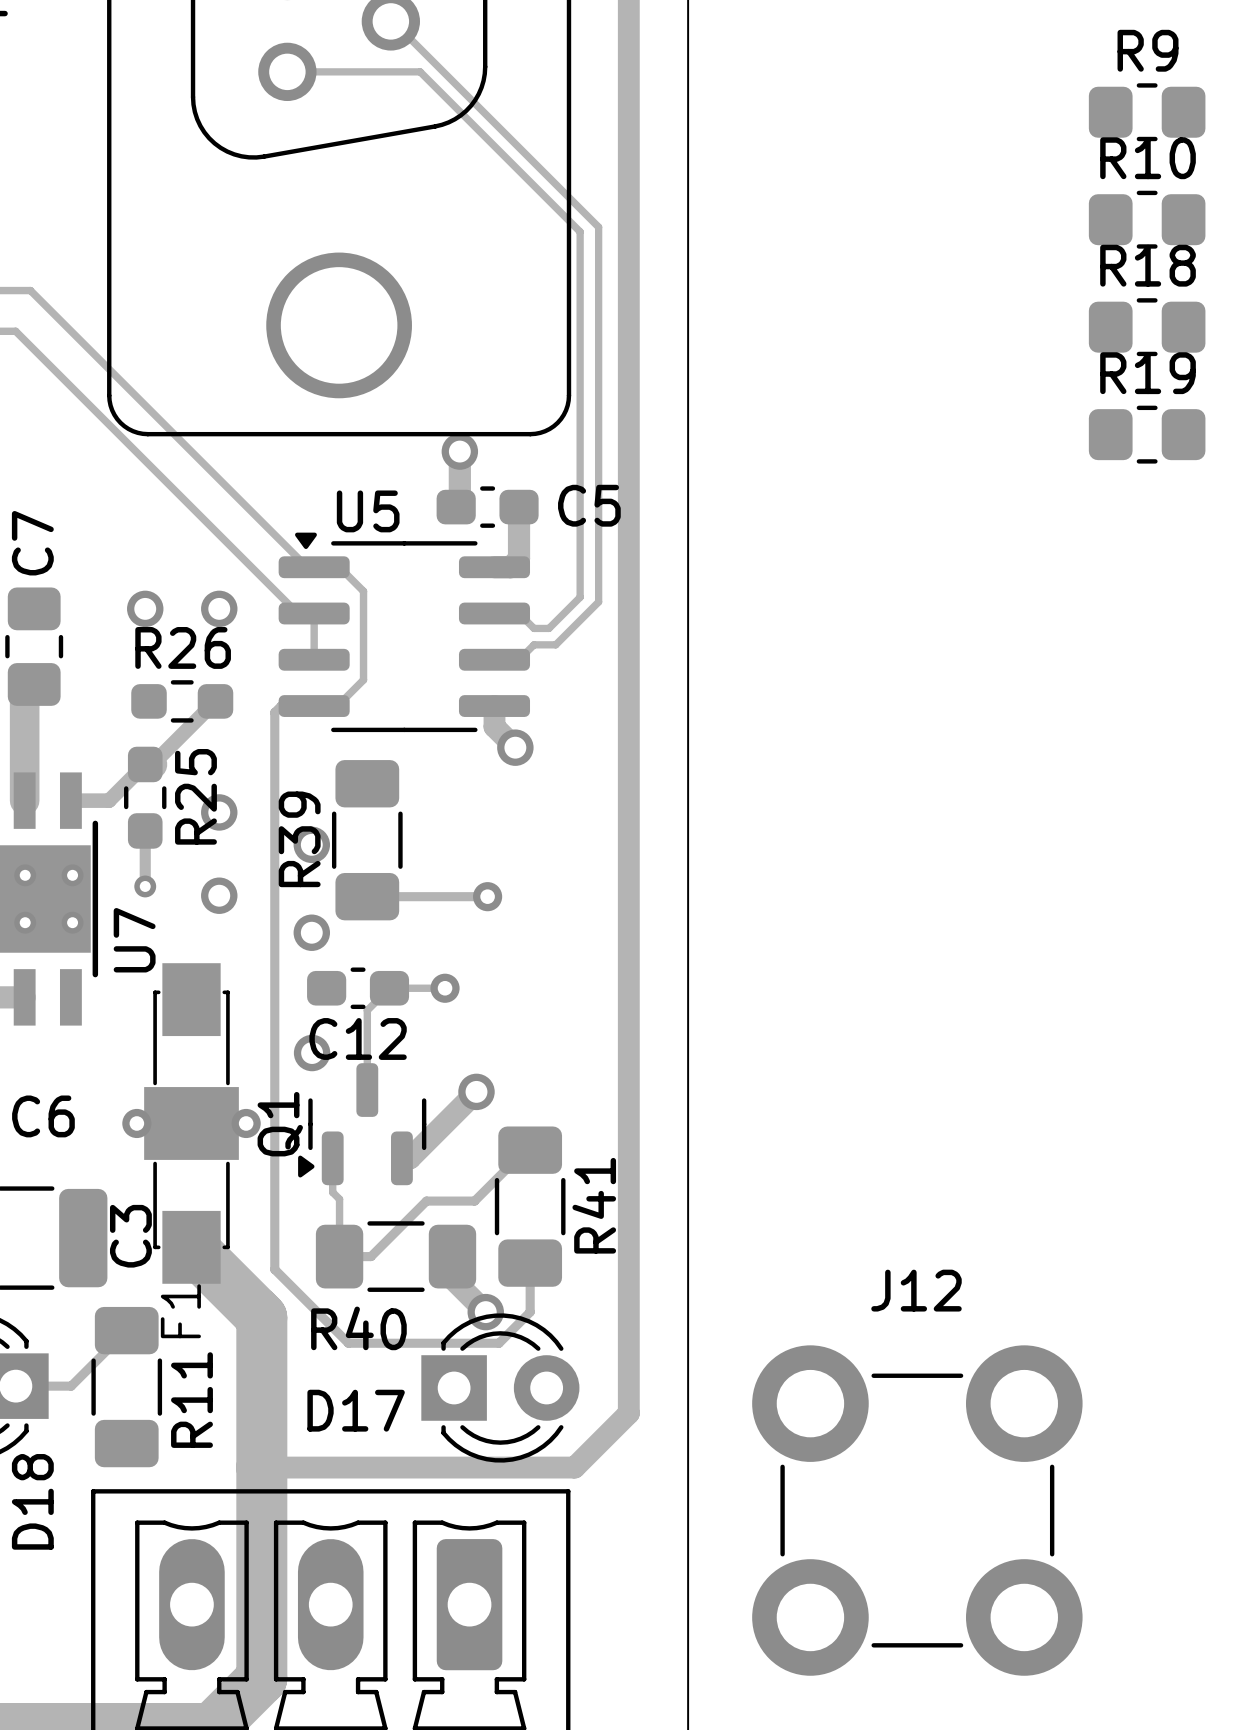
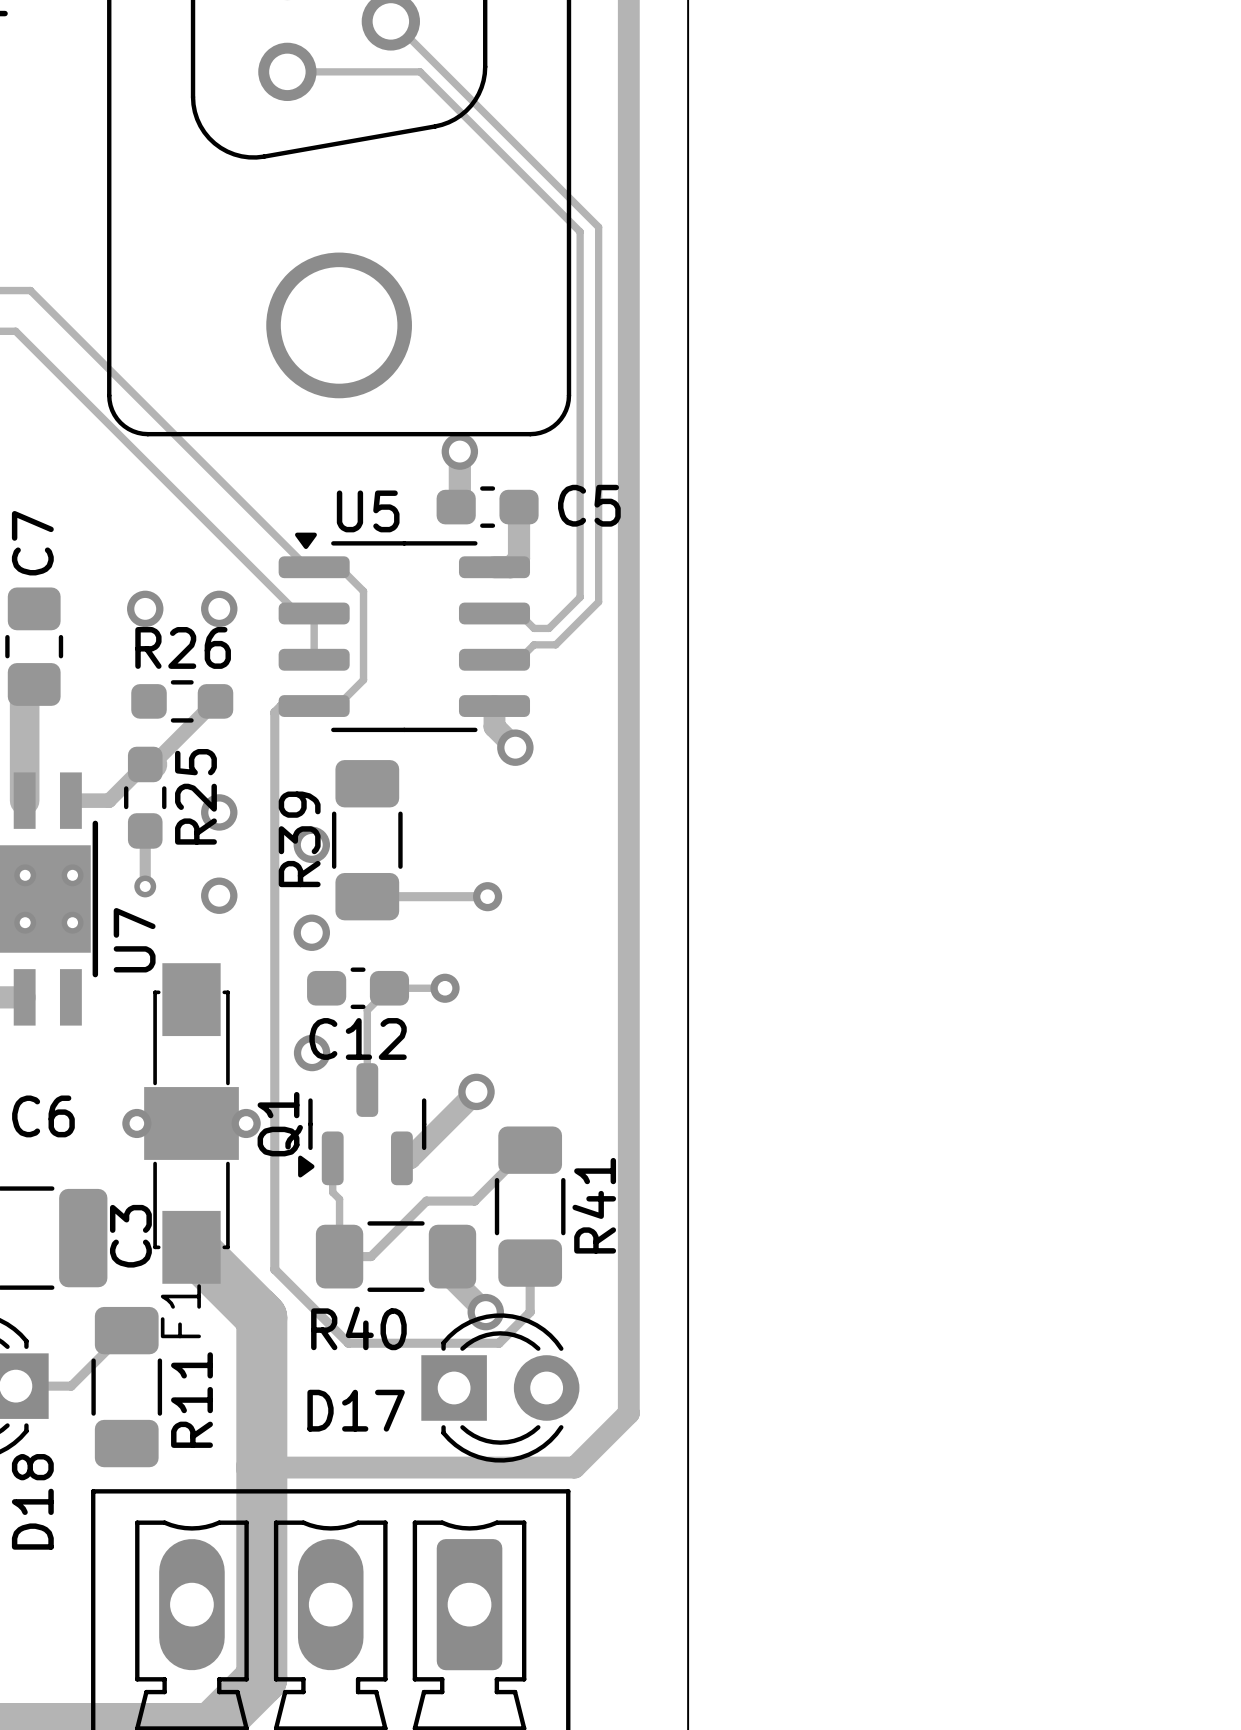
R9: (1147, 112) -> none
R10: (1147, 219) -> none
R18: (1147, 327) -> none
R19: (1147, 434) -> none
J12: (917, 1510) -> none

